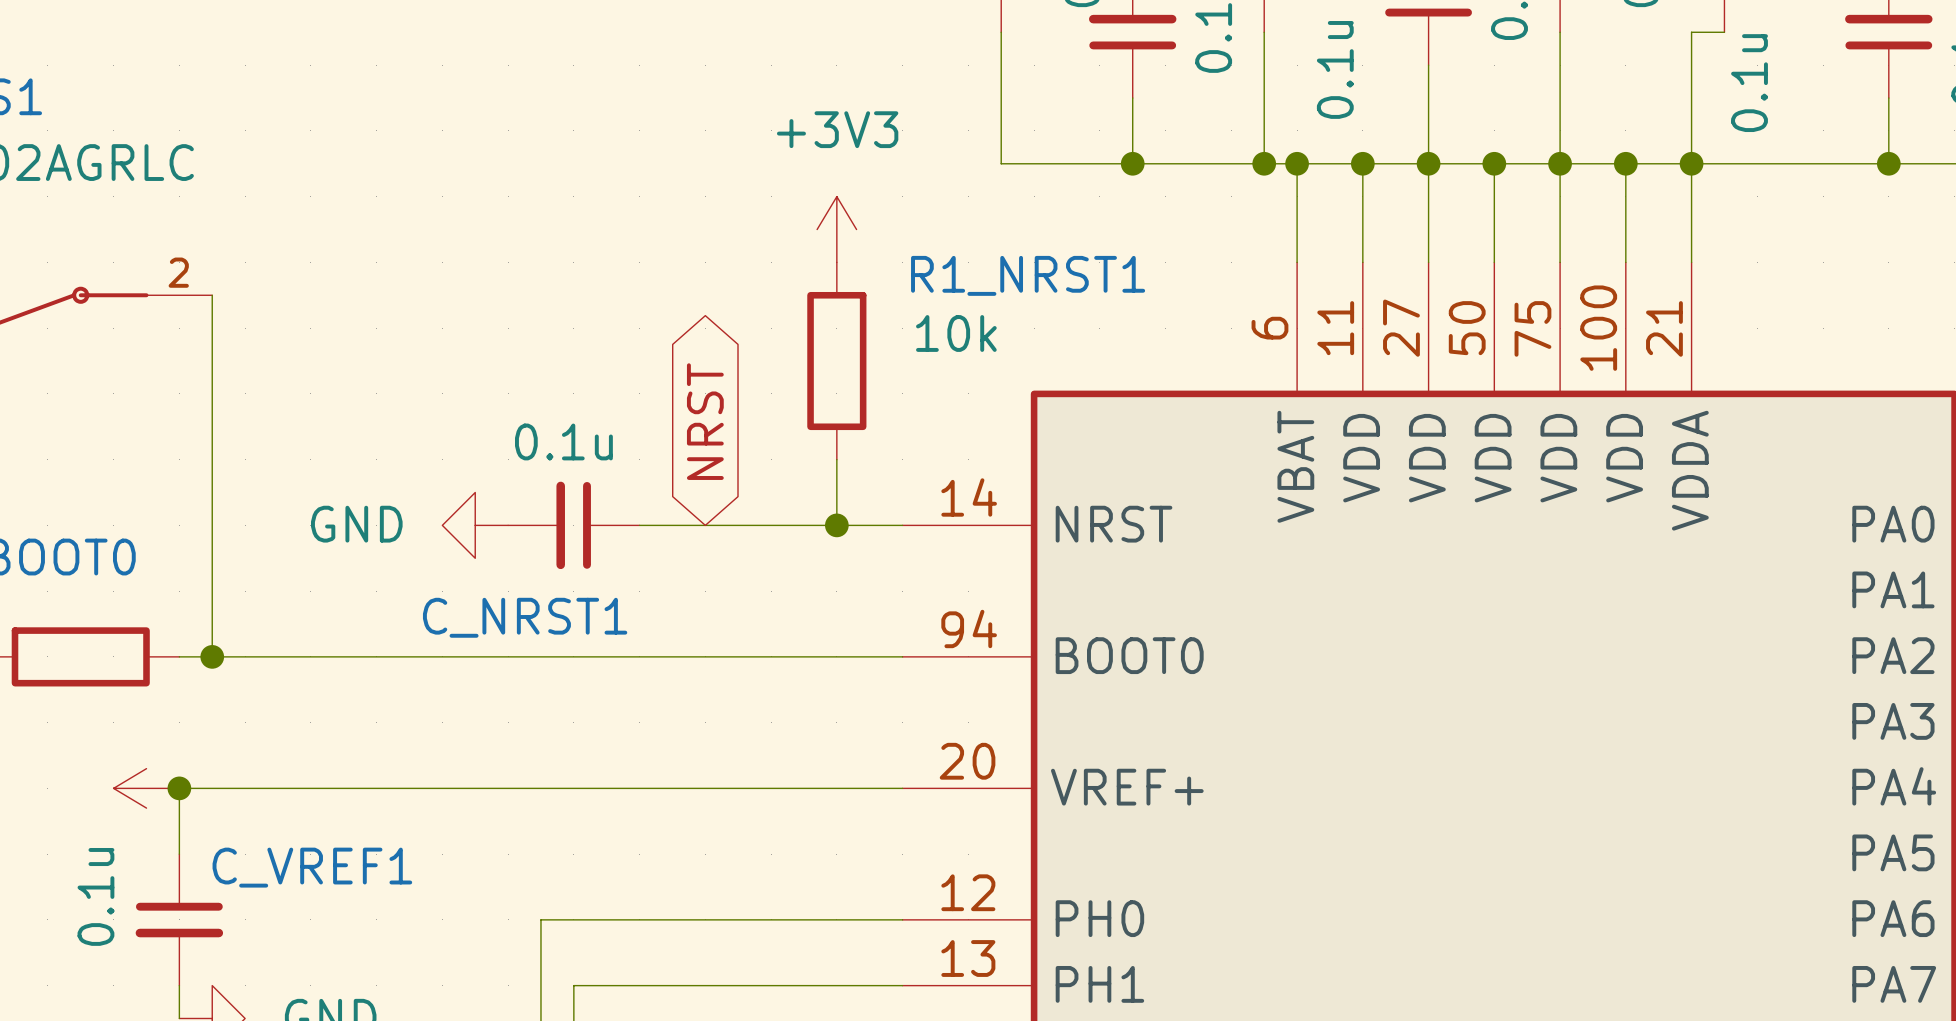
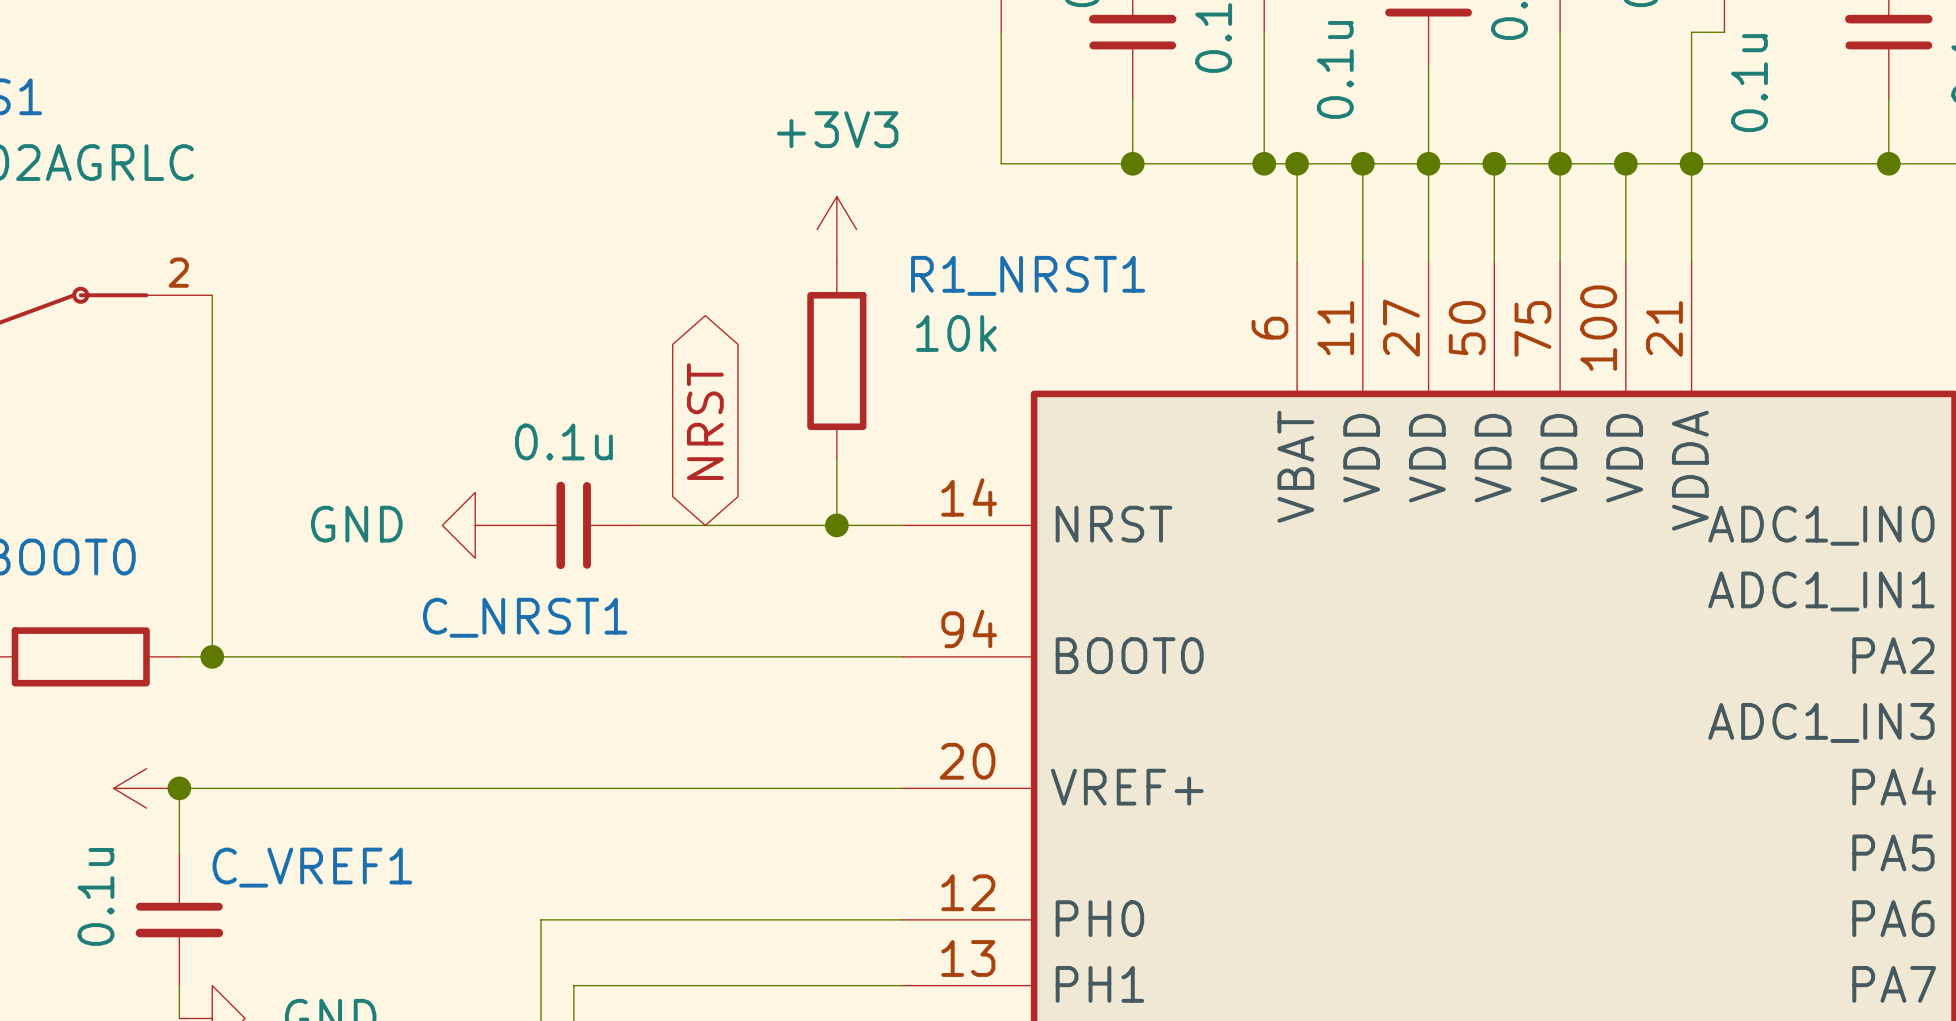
part pin name: PA0 (1893, 524) -> ADC1_IN0 (1821, 525)
part pin name: PA1 (1893, 589) -> ADC1_IN1 (1821, 591)
part pin name: PA3 (1893, 721) -> ADC1_IN3 (1821, 722)

